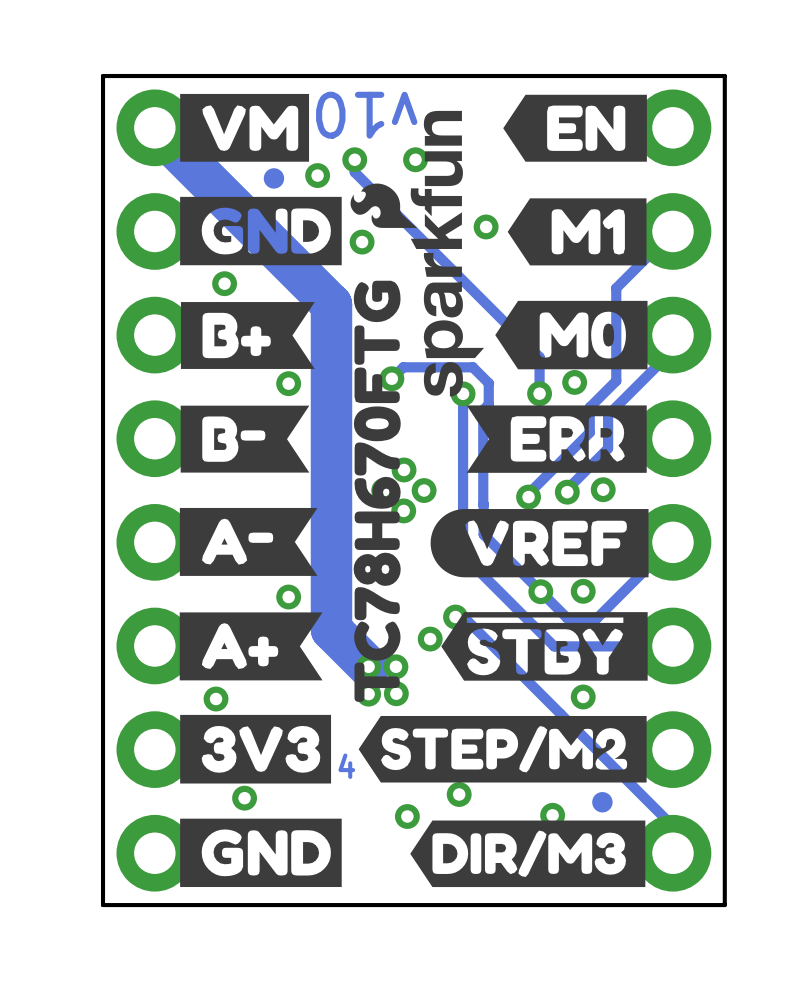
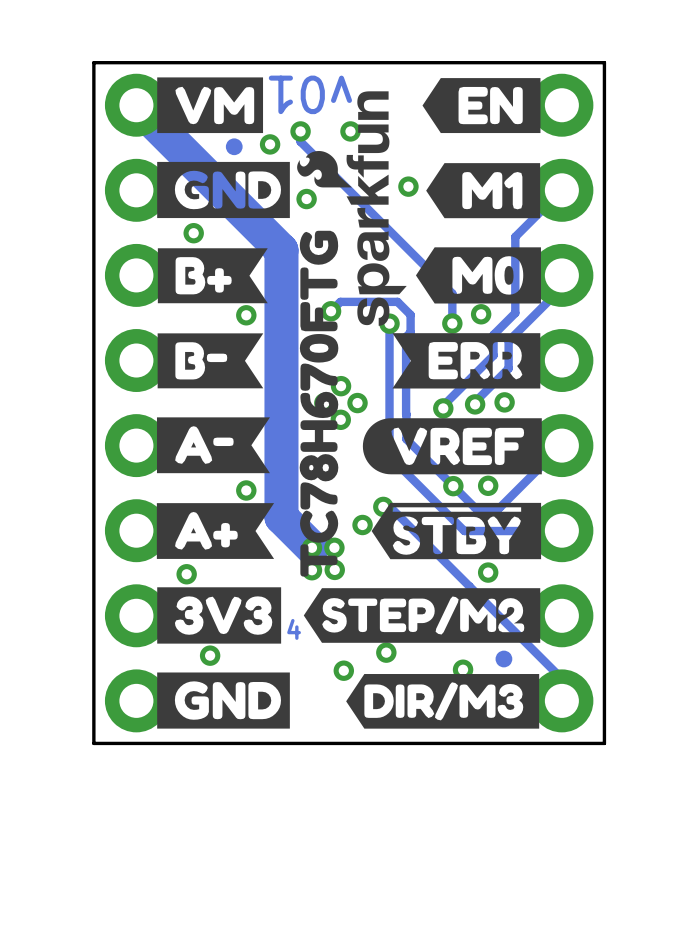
text: v10 (366, 115) -> v01 (310, 94)

